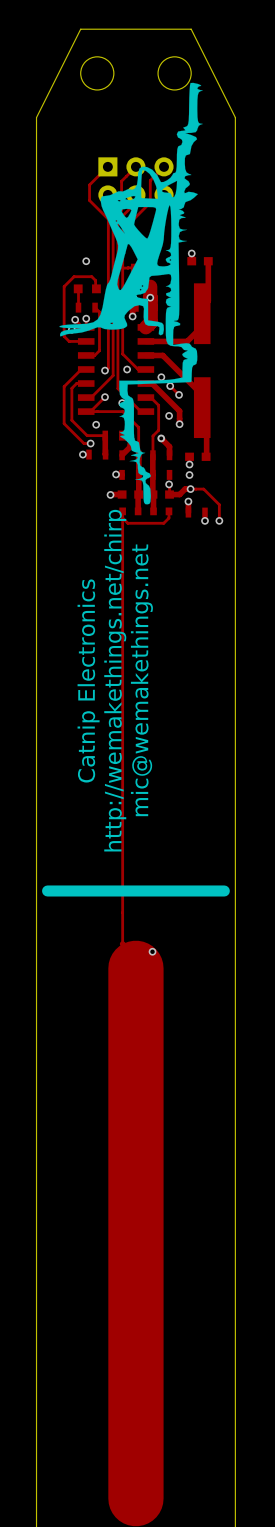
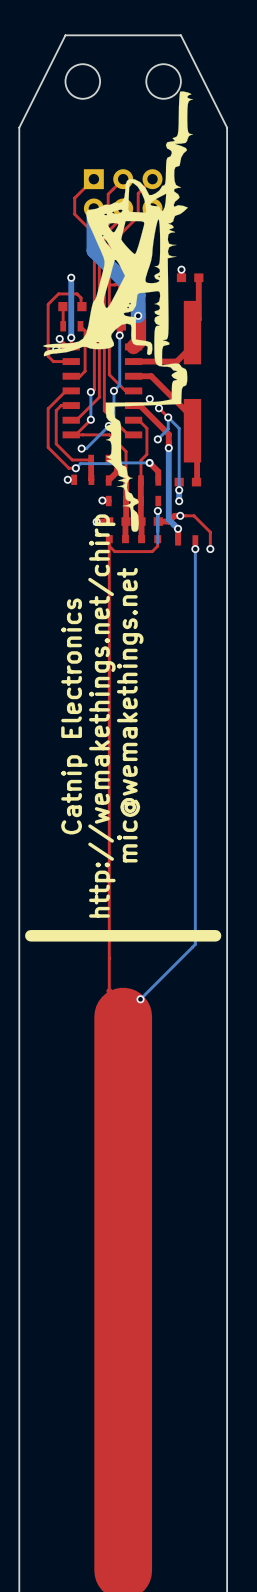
bottom track: none -> (93, 208) (93, 250) (138, 295) (138, 315)
bottom track: none -> (71, 277) (71, 337)
bottom track: none -> (119, 335) (119, 385) (113, 390) (113, 420) (86, 448) (81, 448)
bottom track: none -> (90, 392) (90, 419)
bottom track: none -> (157, 439) (168, 428) (168, 417) (179, 428) (179, 501)
bottom track: none -> (168, 448) (168, 519) (178, 528)
bottom track: none -> (149, 462) (80, 463) (75, 468)
bottom track: none -> (157, 510) (157, 543)
bottom track: none -> (195, 549) (195, 944) (140, 999)

